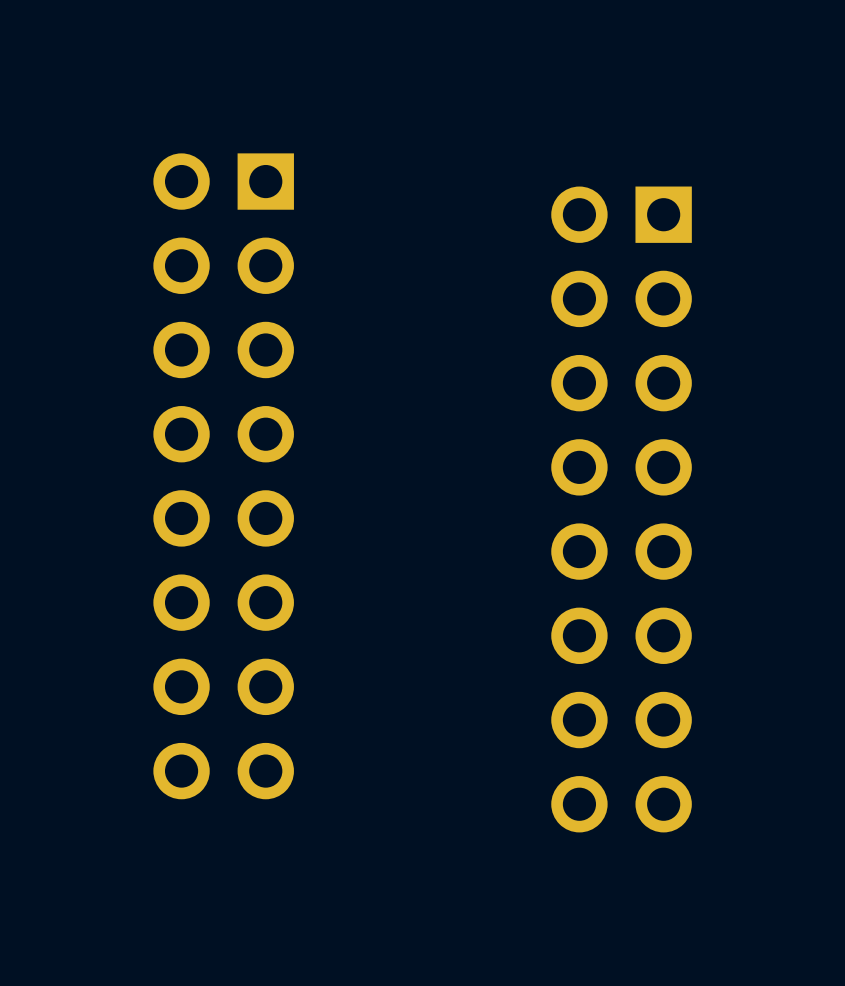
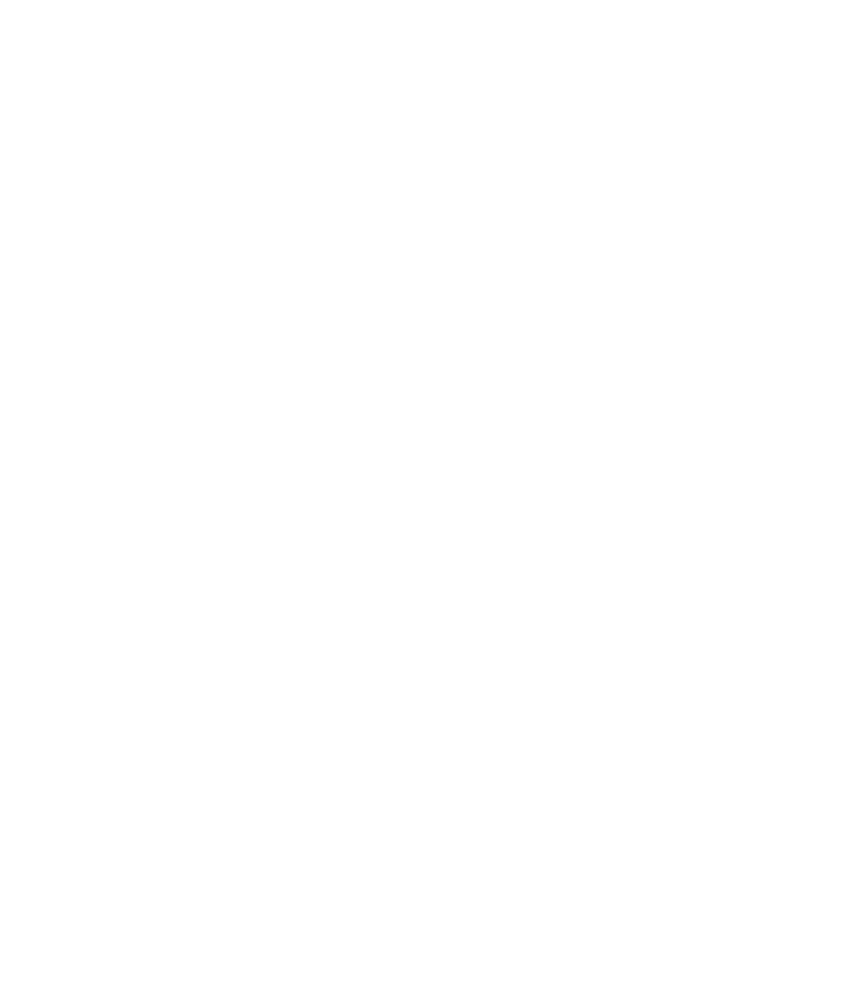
part: (223, 476) -> none
part: (621, 509) -> none

